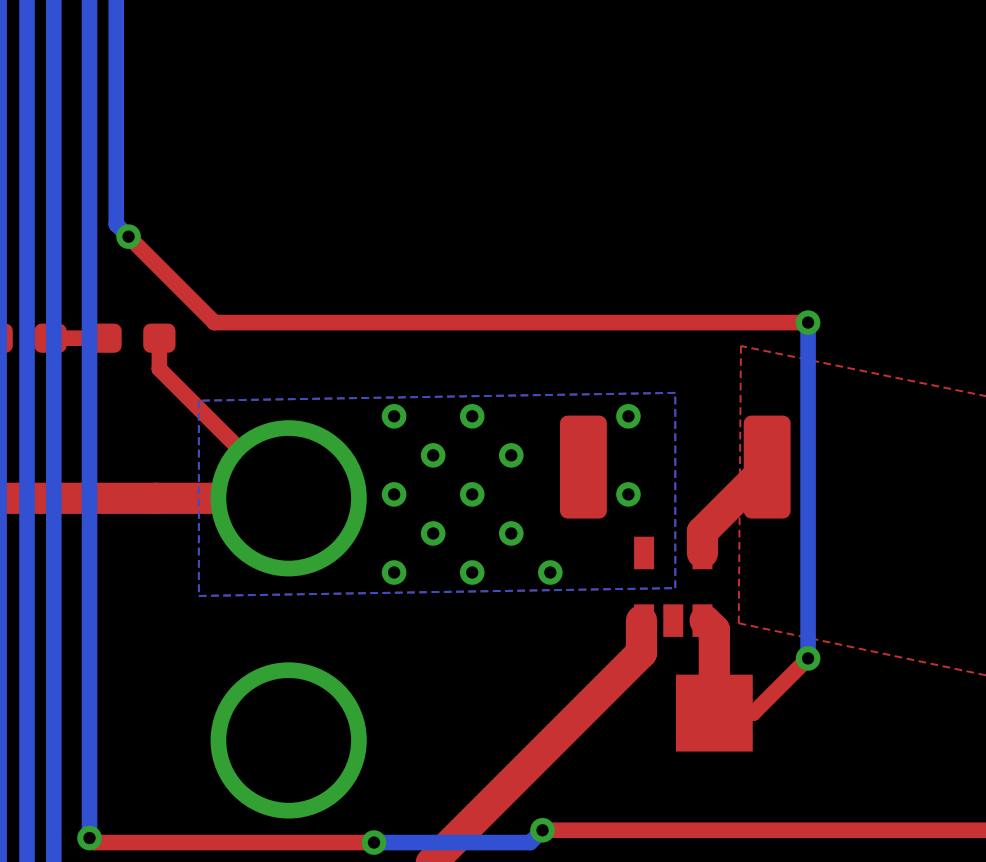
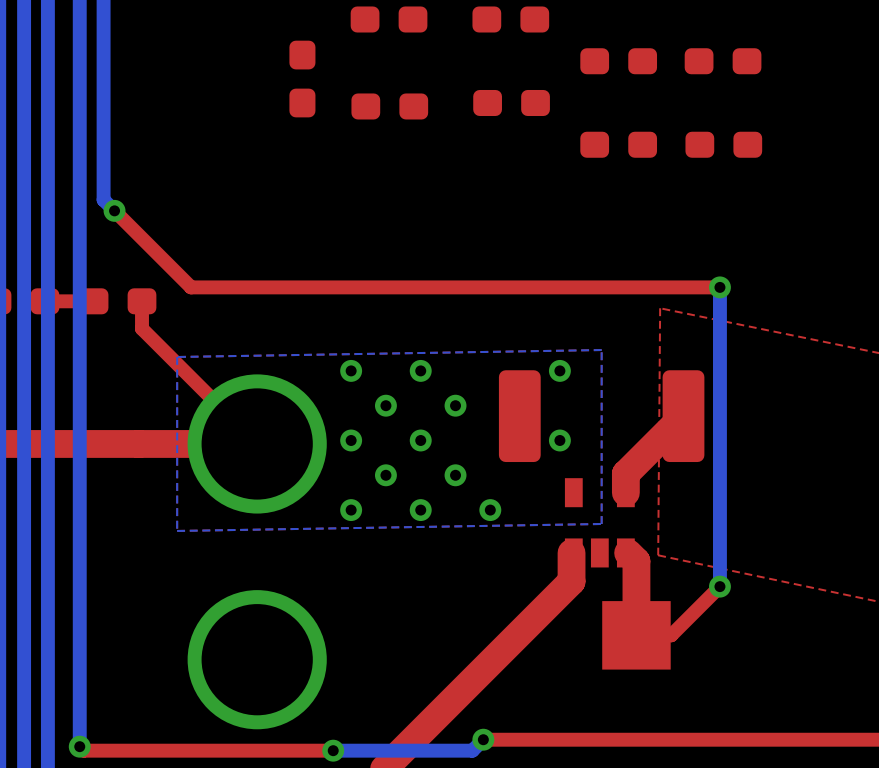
part: none -> (389, 19)
part: none -> (510, 19)
part: none -> (618, 61)
part: none -> (723, 61)
part: none -> (302, 79)
part: none -> (511, 102)
part: none -> (389, 106)
part: none -> (618, 144)
part: none -> (723, 144)

